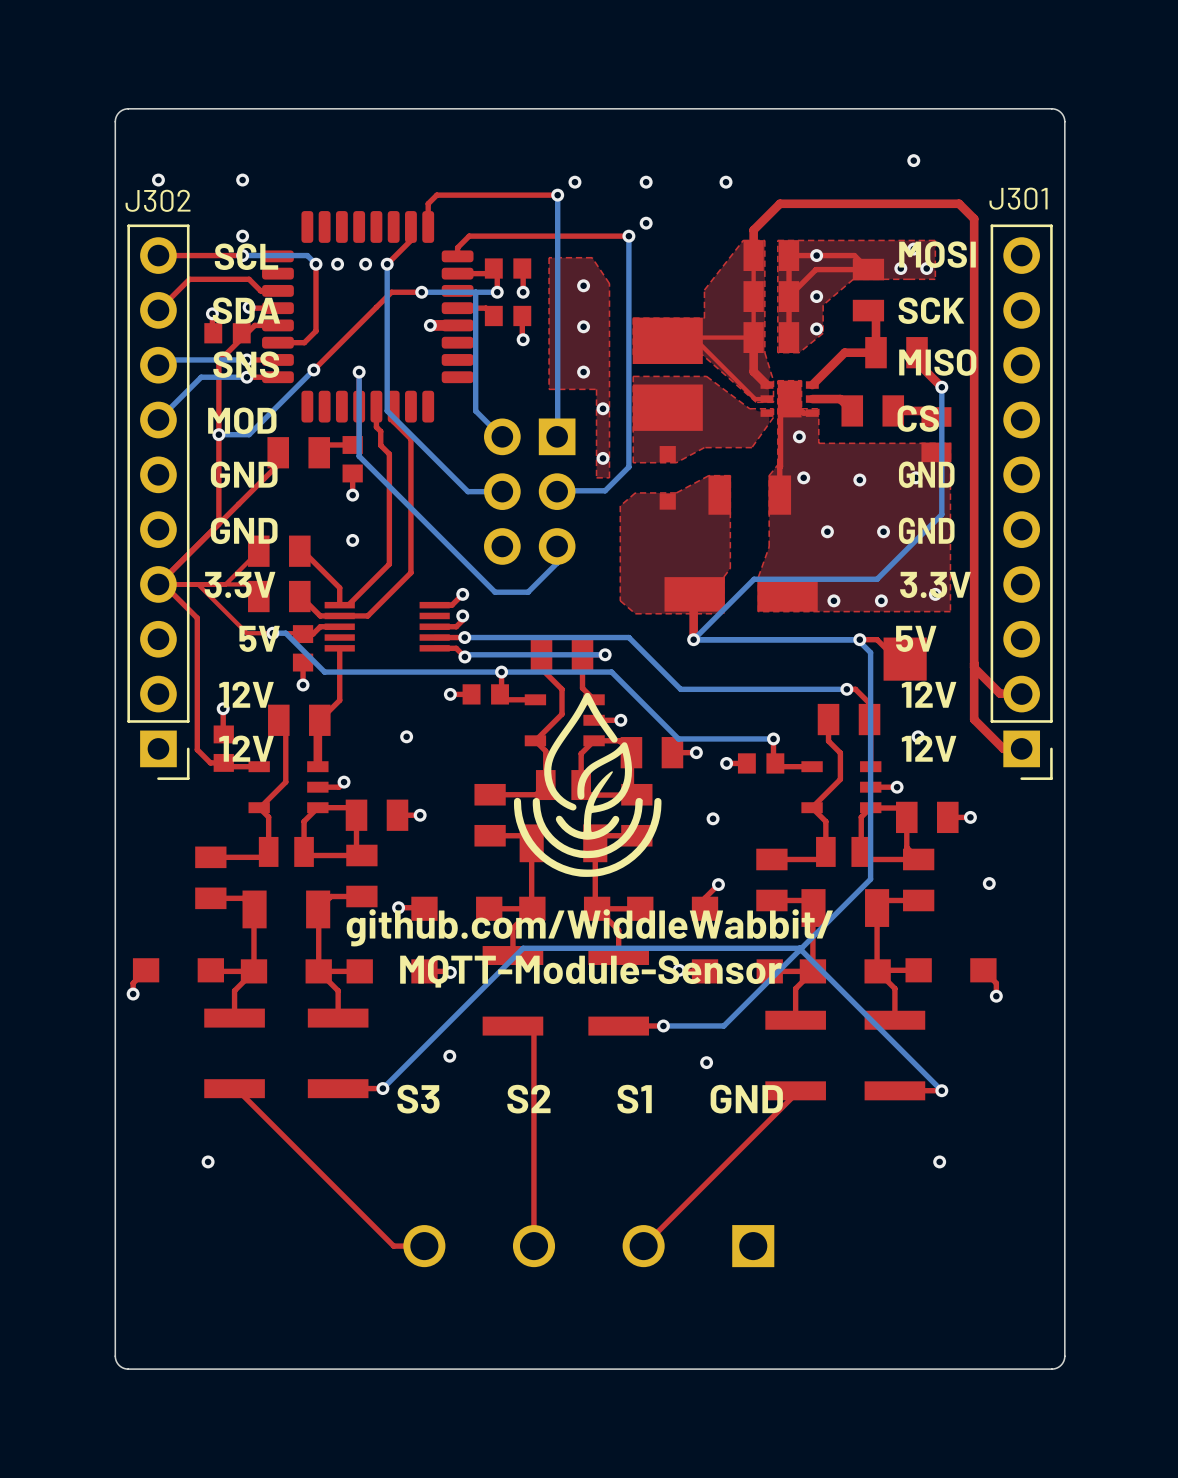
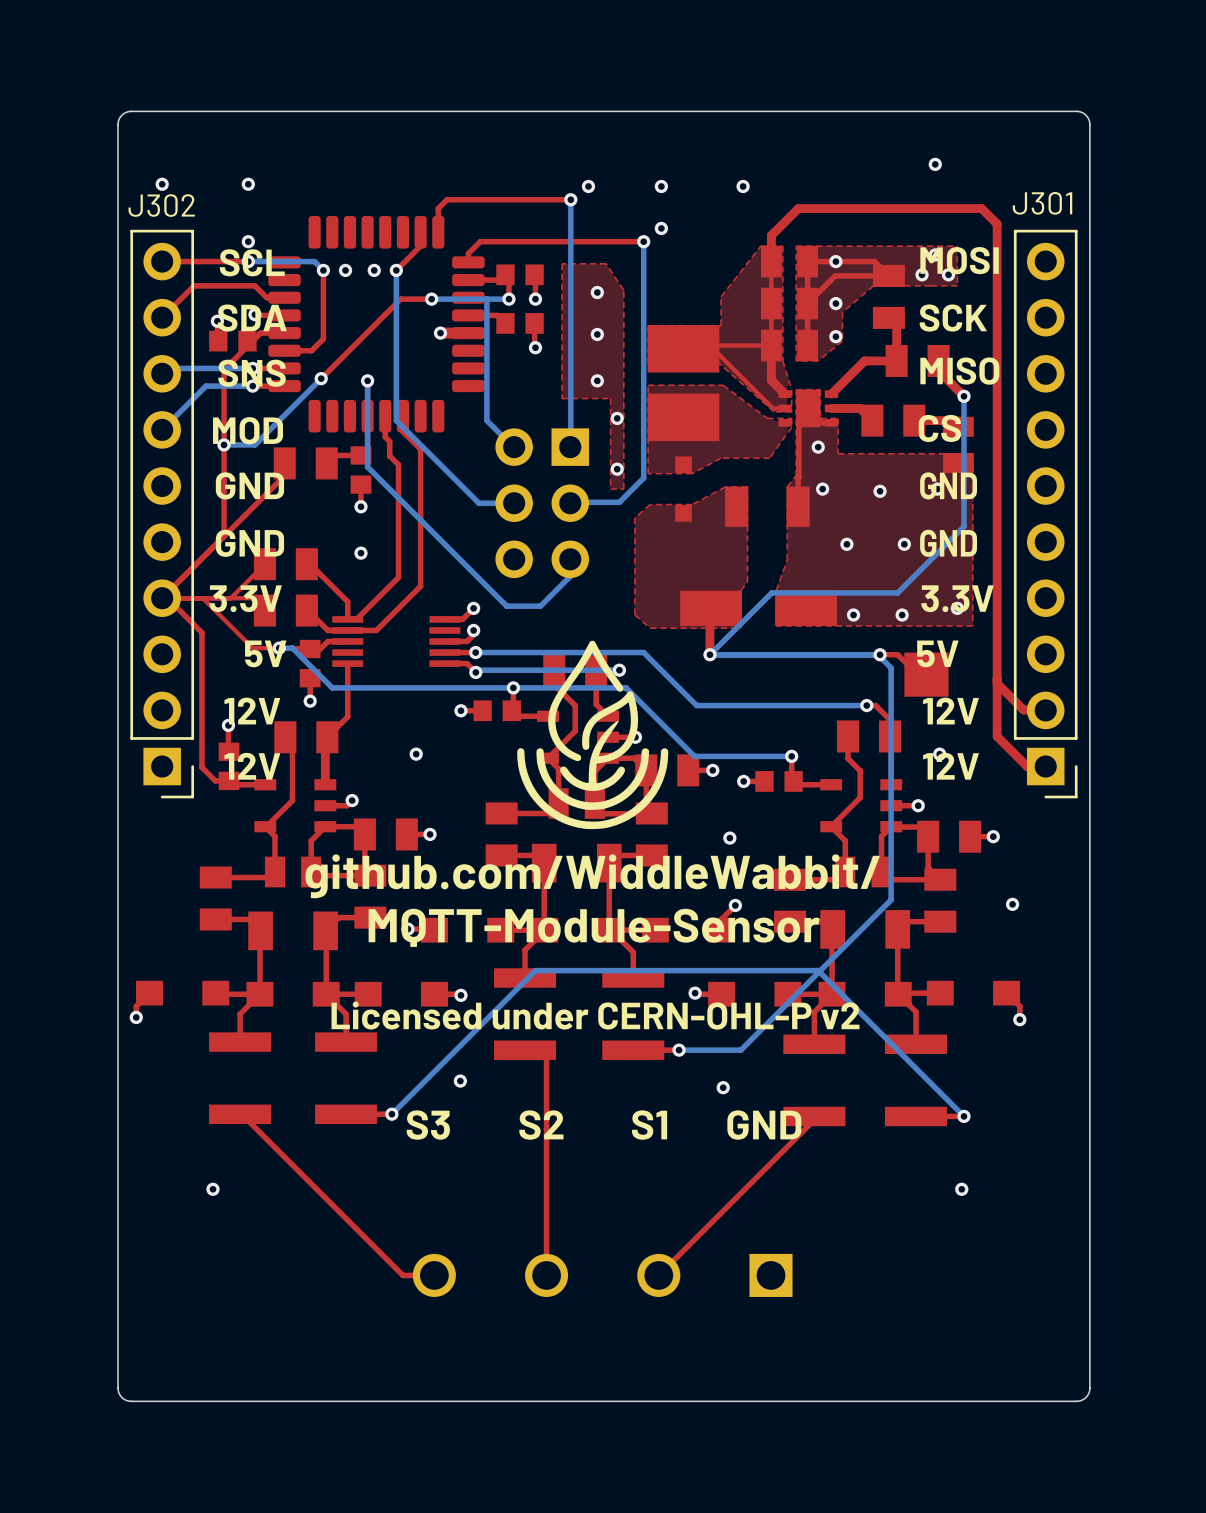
drawing position: (587, 784) -> (592, 734)
text: none -> github.com/WiddleWabbit/ (592, 876)
text: github.com/WiddleWabbit/ (589, 927) -> MQTT-Module-Sensor (594, 927)
text: MQTT-Module-Sensor (591, 971) -> none
text: none -> Licensed under CERN-OHL-P v2 (595, 1015)

